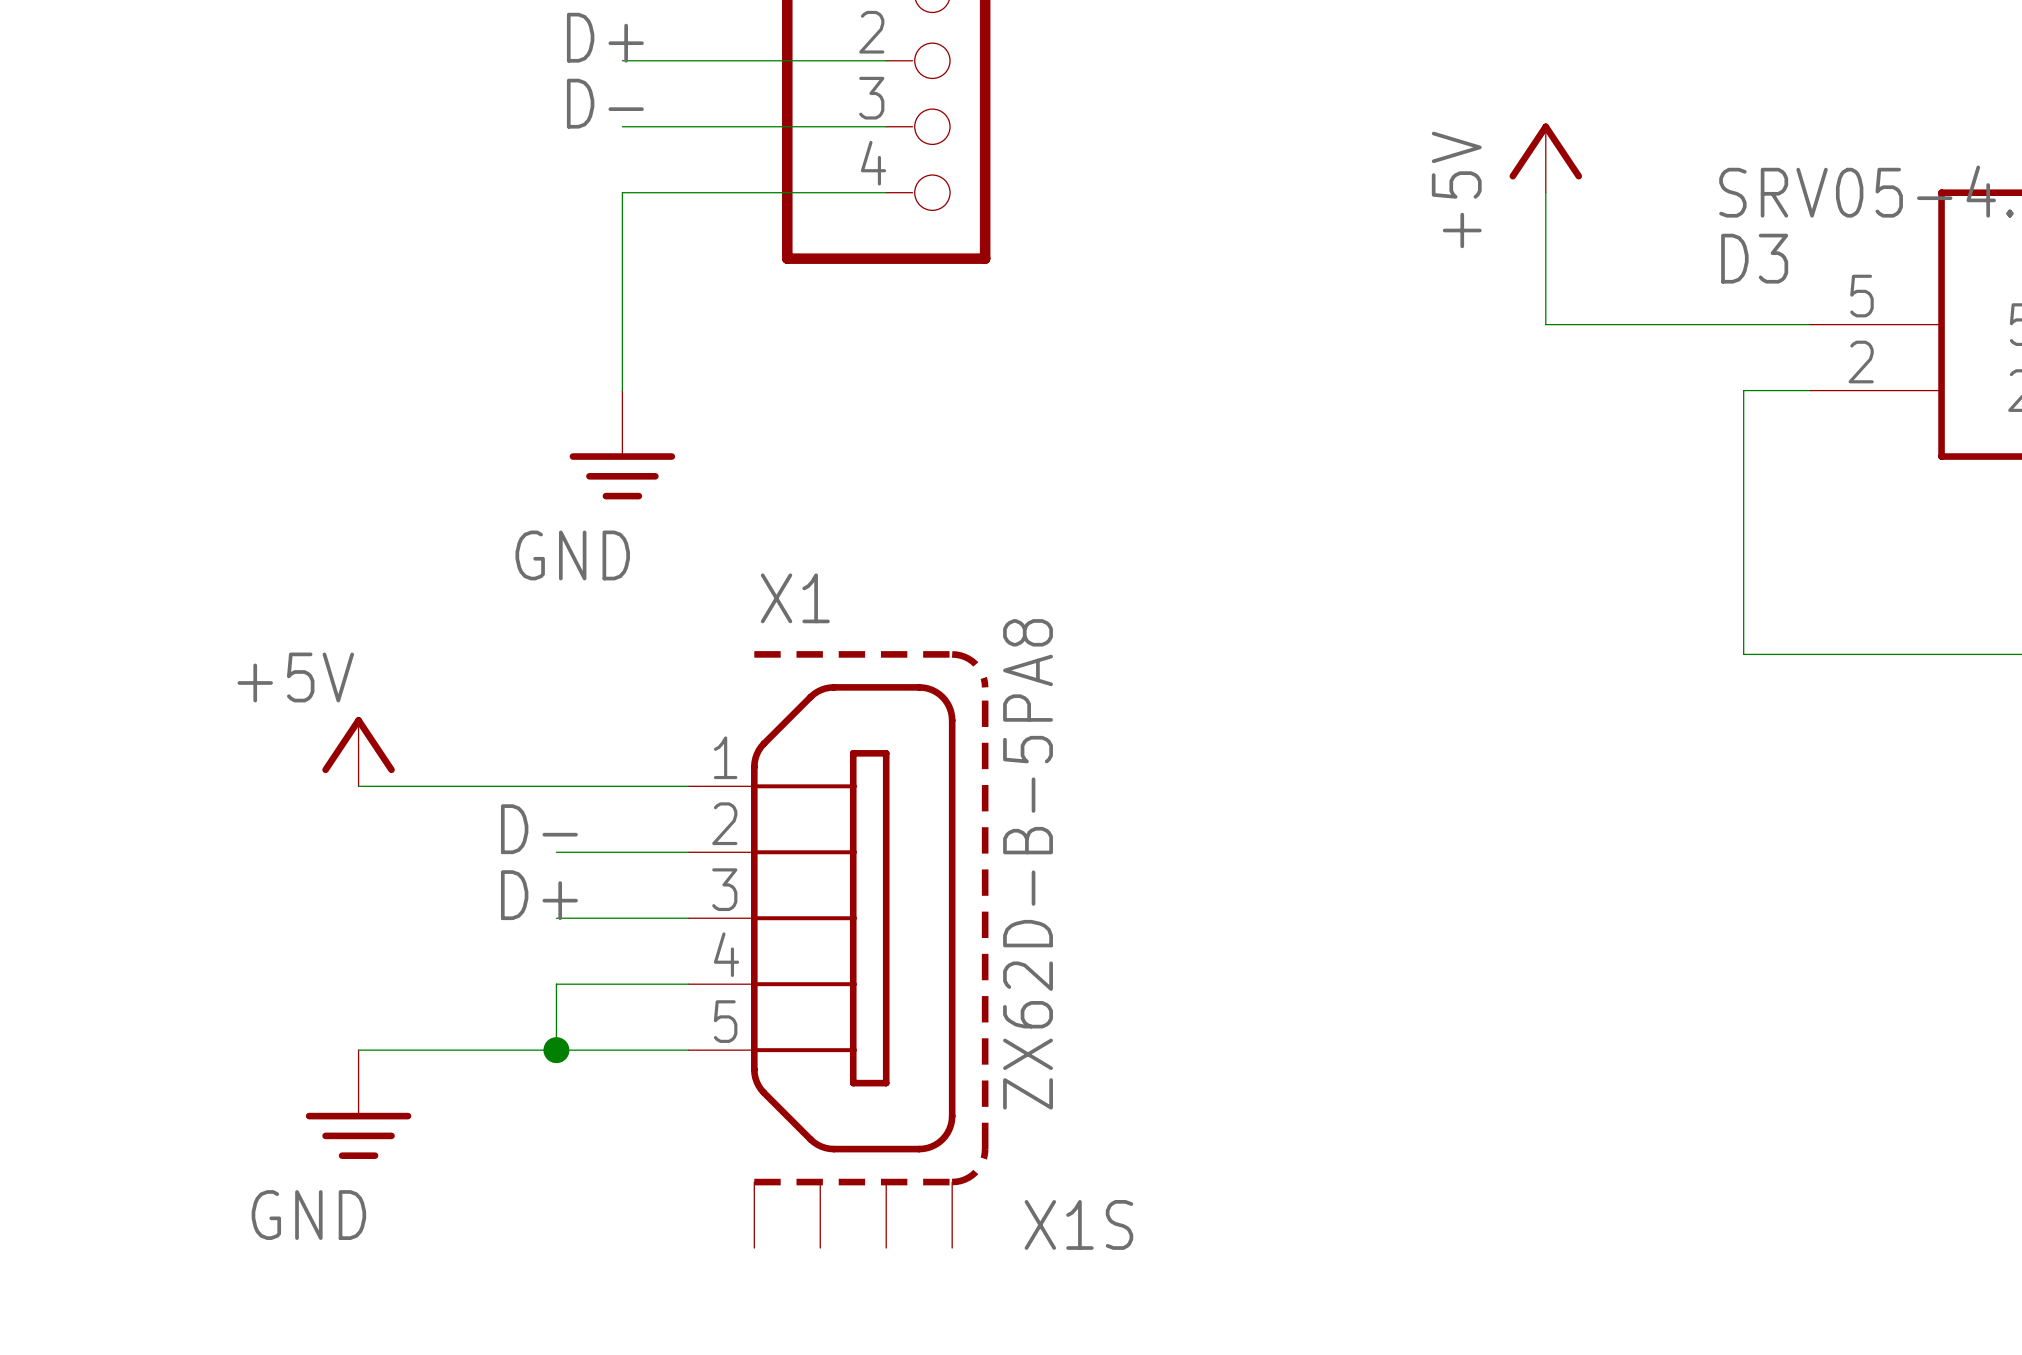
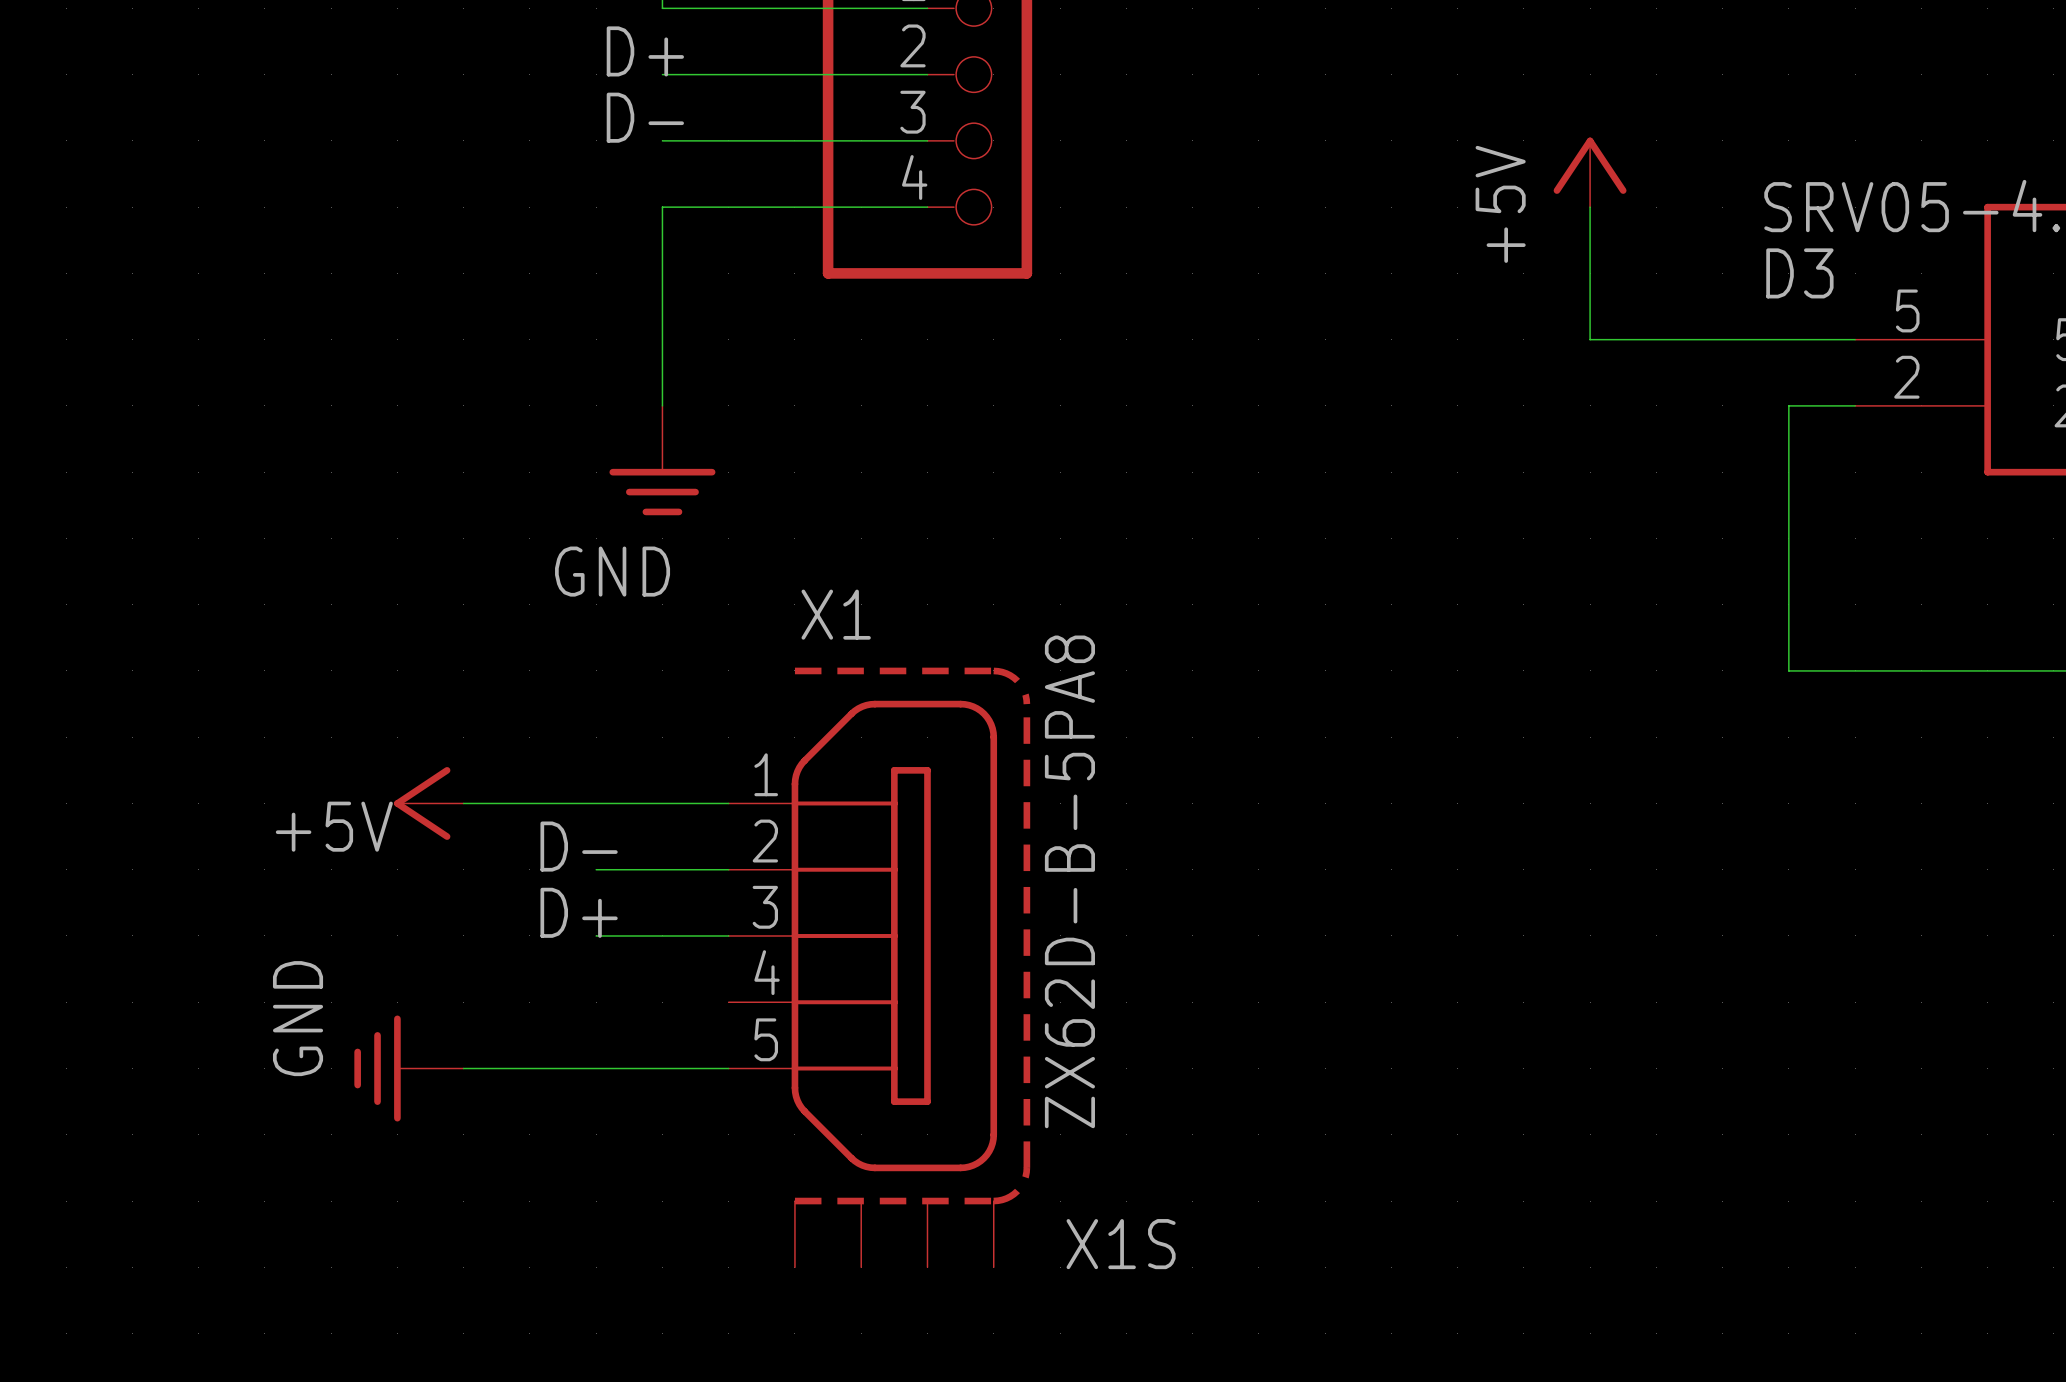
power symbol text position: +5V (295, 677) -> +5V (334, 826)
power symbol rotation: 0° (358, 745) -> 90° counterclockwise (422, 803)
power symbol position: +5V (358, 751) -> +5V (428, 803)
wire: (688, 984) (556, 984) (556, 1050) -> none
junction: (556, 1050) -> none
power symbol rotation: 0° (358, 1135) -> 90° clockwise (377, 1068)

